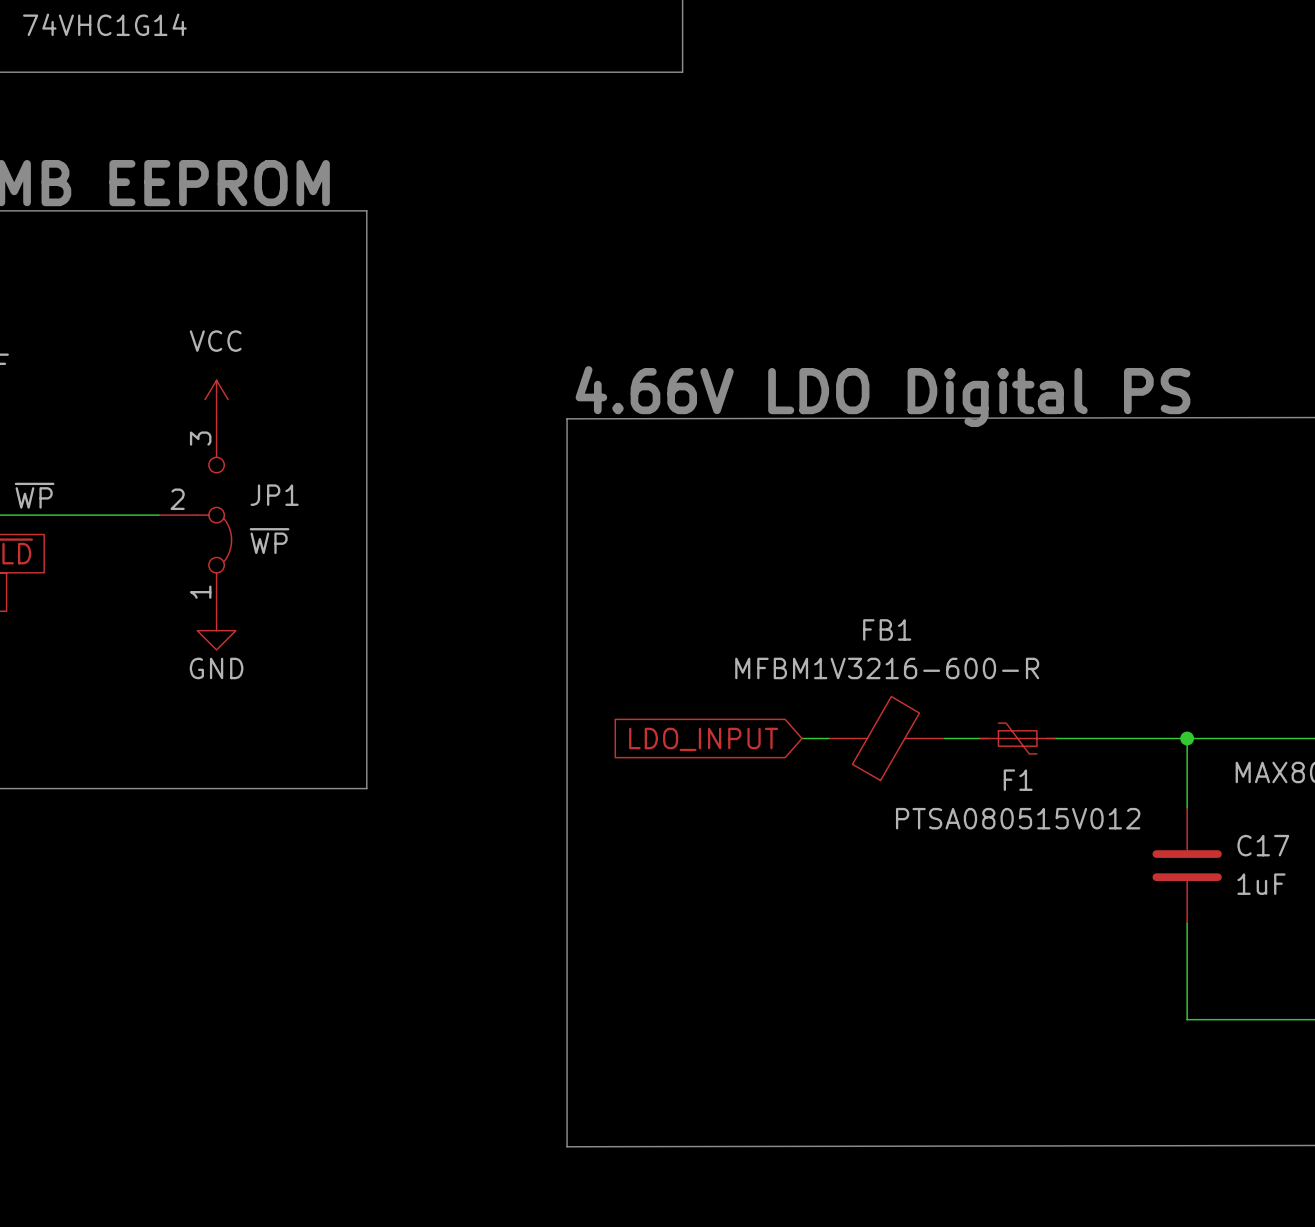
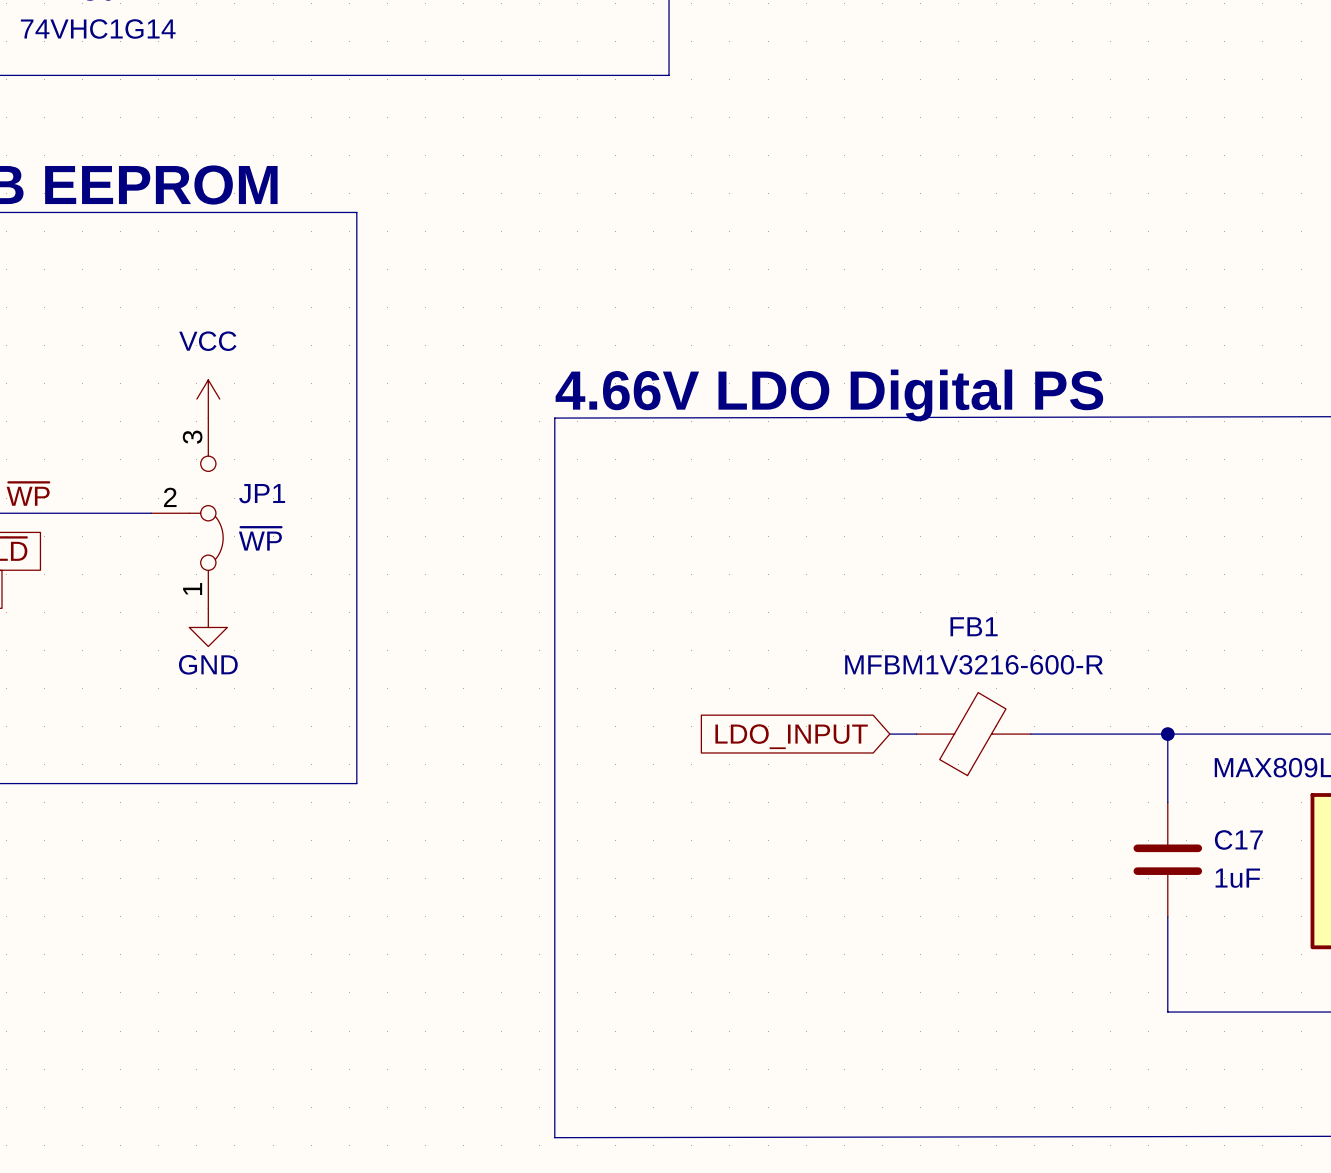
FB1 position: (886, 738) -> (973, 734)
F1: PTSA080515V012 (1017, 738) -> none
global label position: LDO_INPUT (703, 739) -> LDO_INPUT (791, 736)

